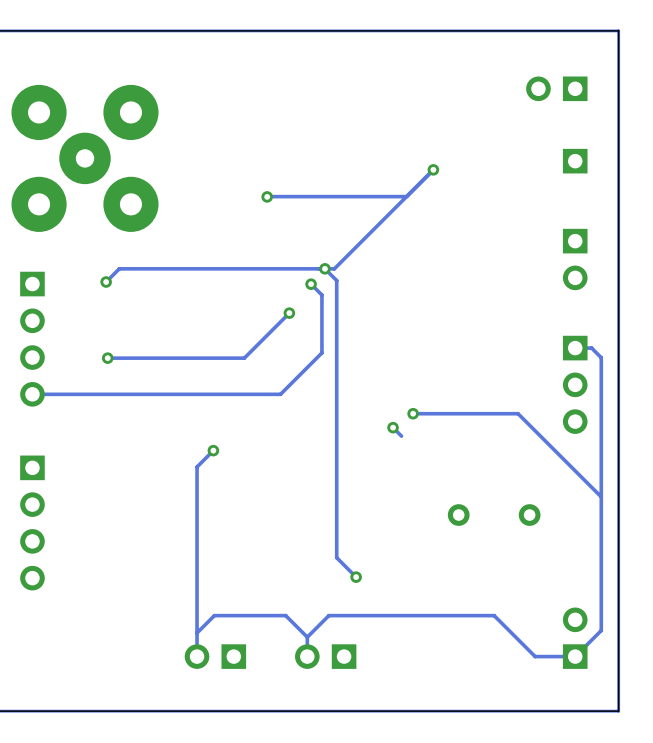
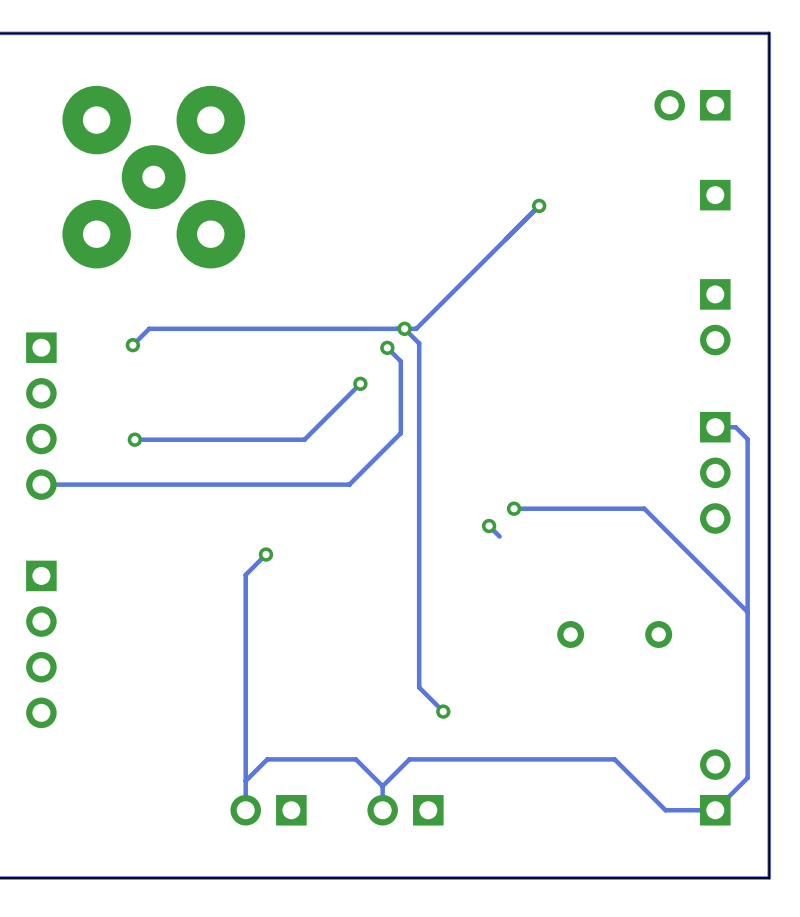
part position: (85, 158) -> (153, 177)
via: (267, 196) -> none
track: (406, 196) (267, 196) -> none

